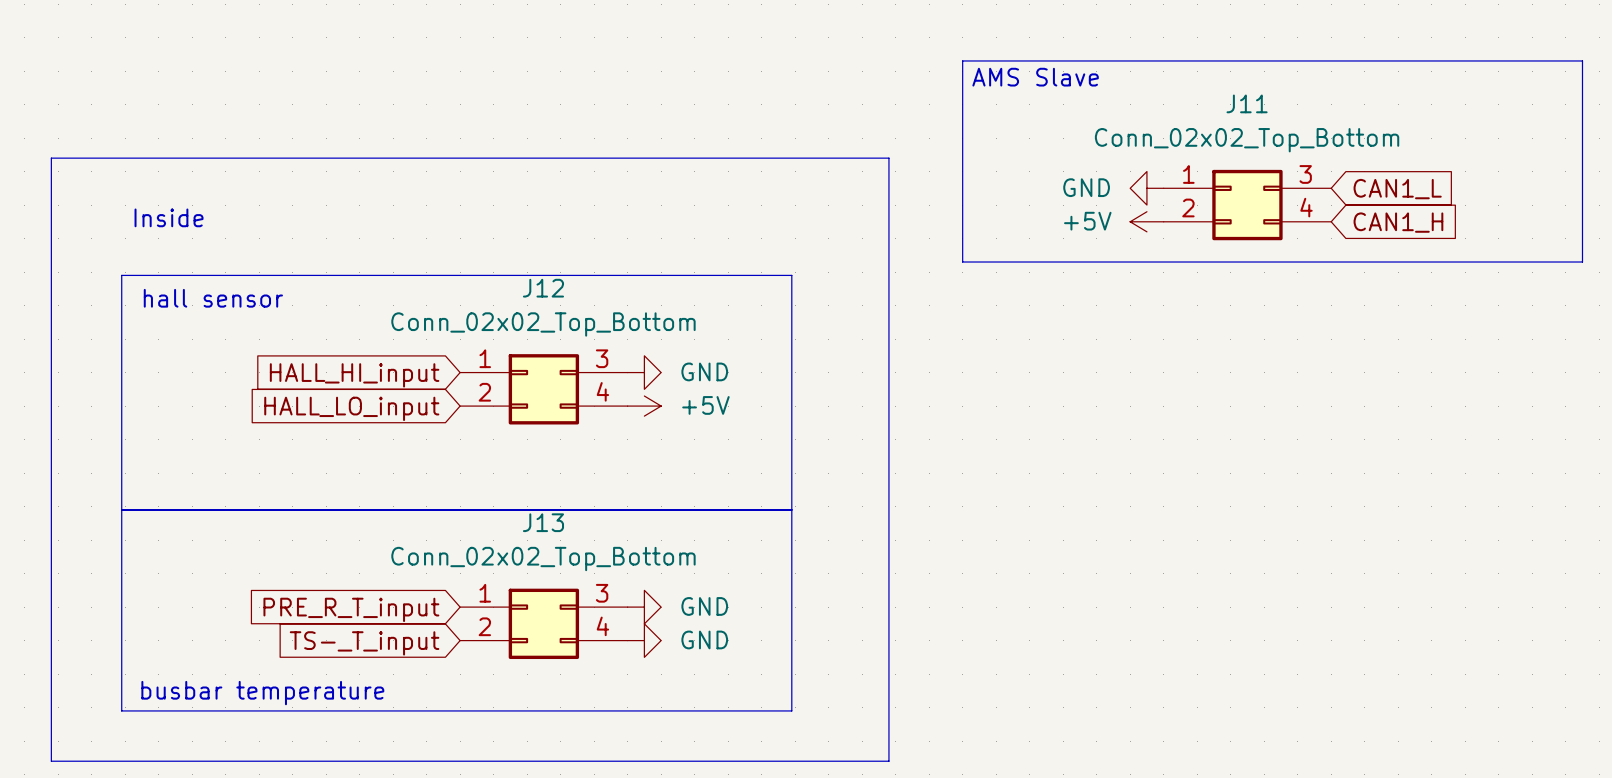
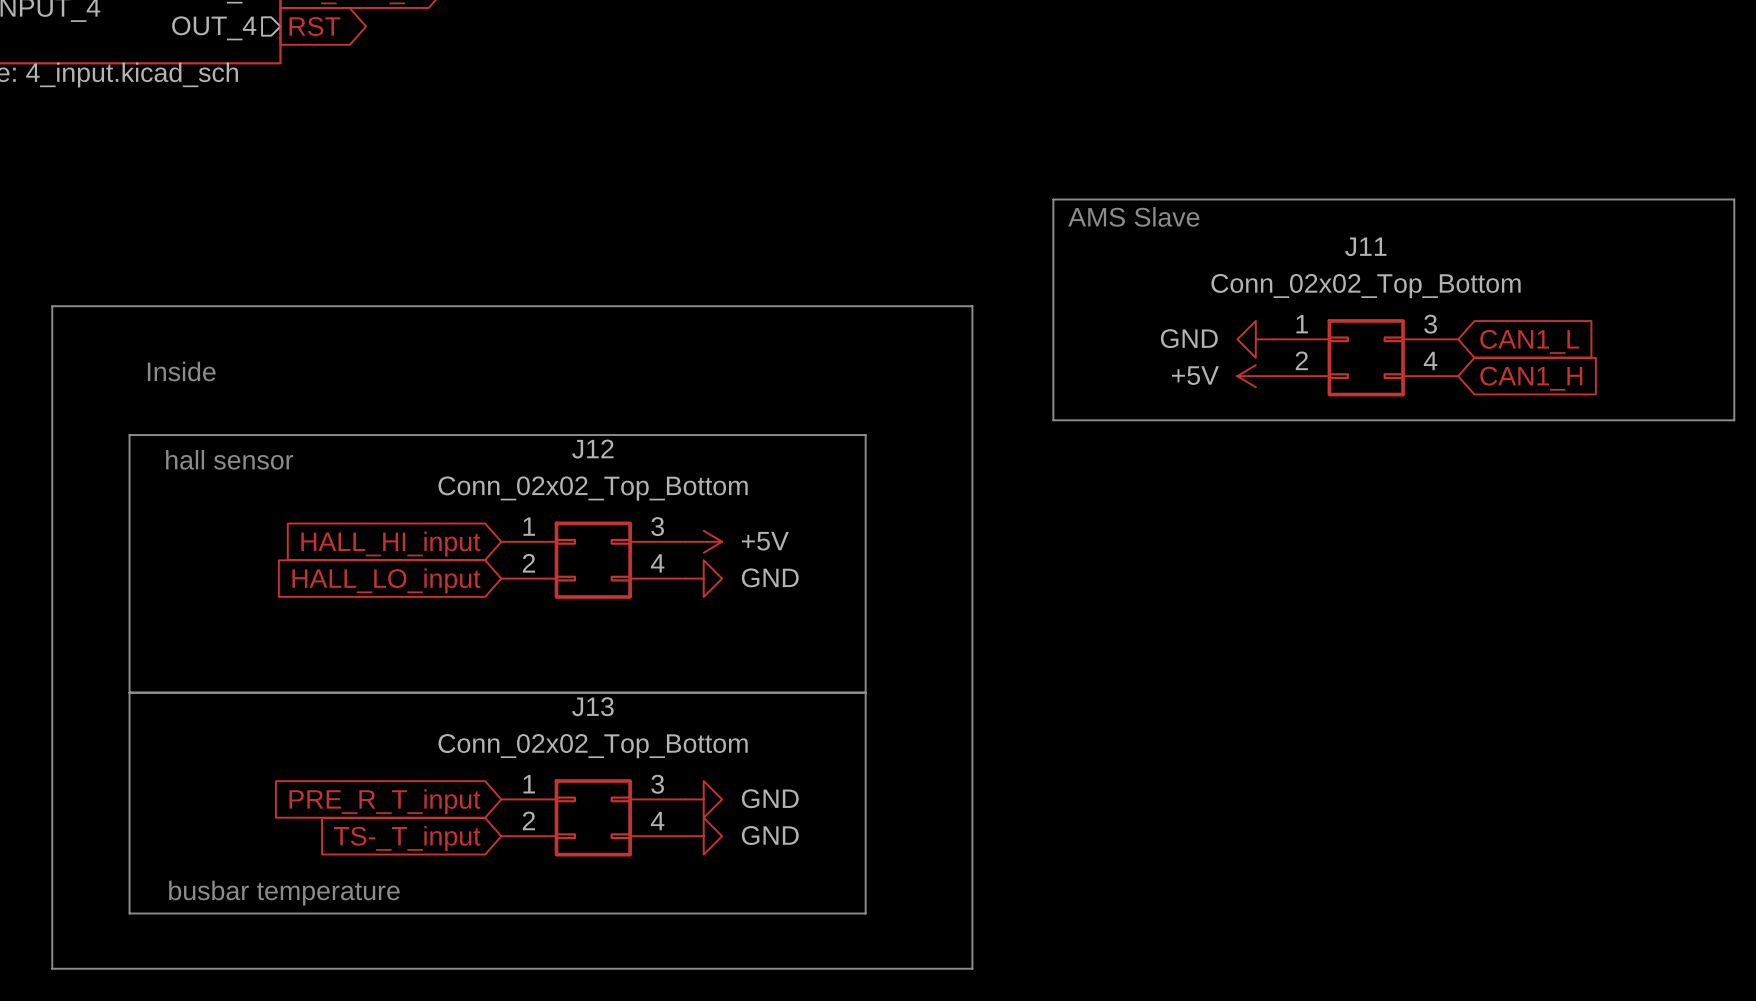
power symbol: GND (644, 372) -> +5V (703, 541)
power symbol: +5V (644, 406) -> GND (703, 578)

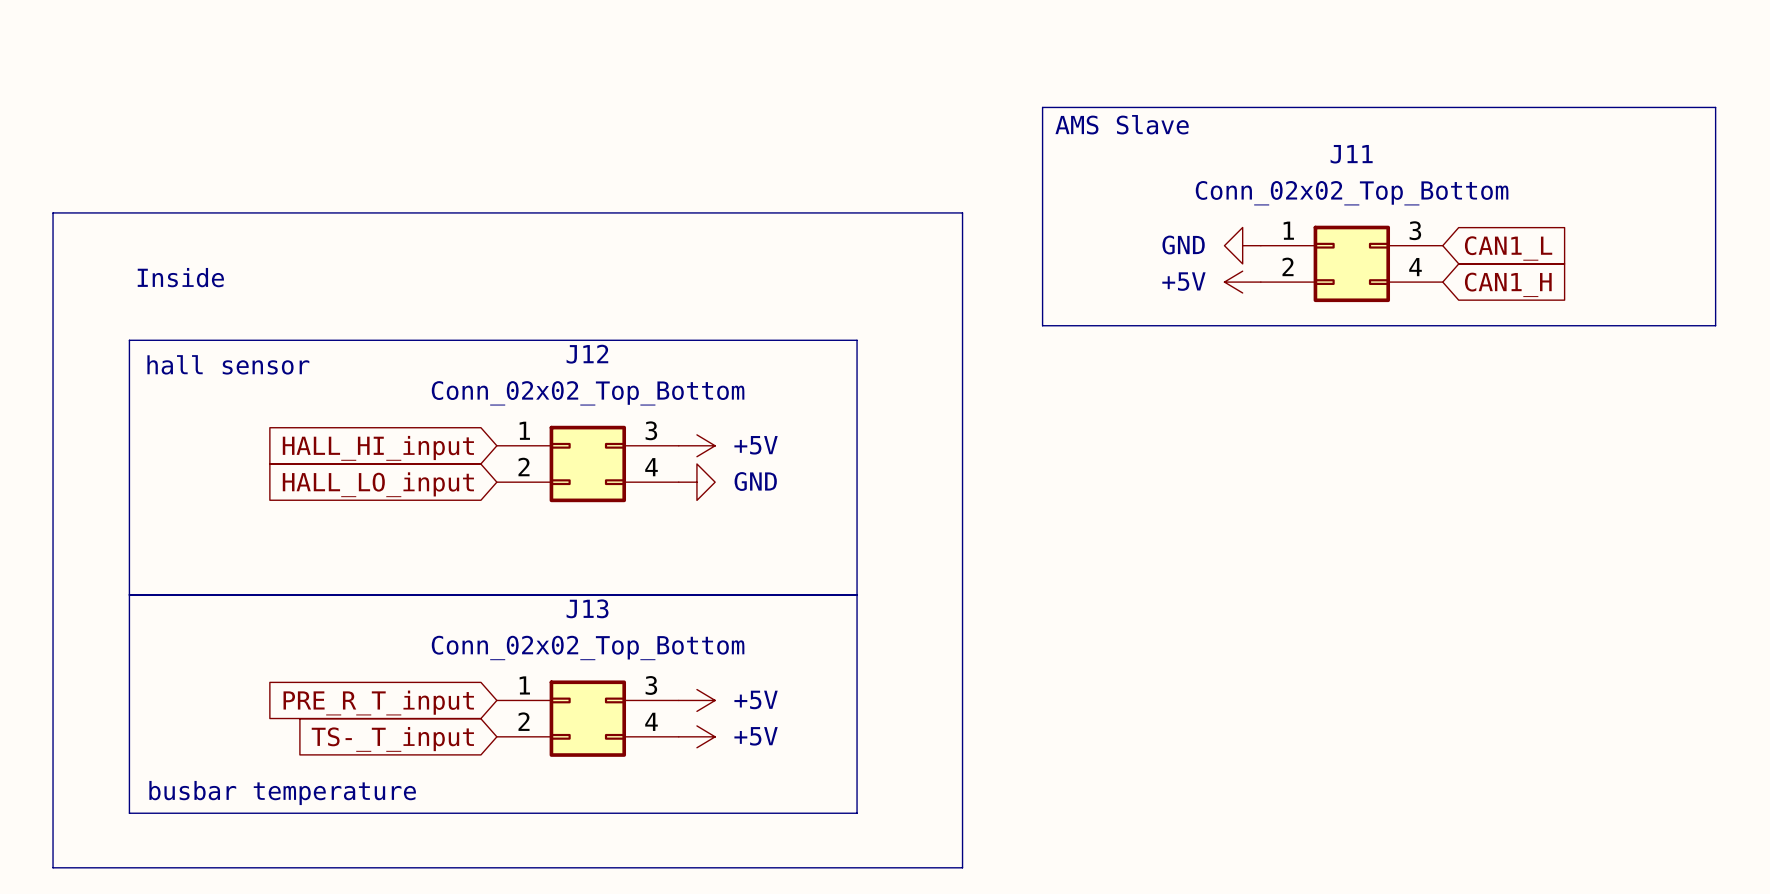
power symbol: GND (703, 799) -> +5V (696, 700)
power symbol: GND (703, 836) -> +5V (696, 736)

